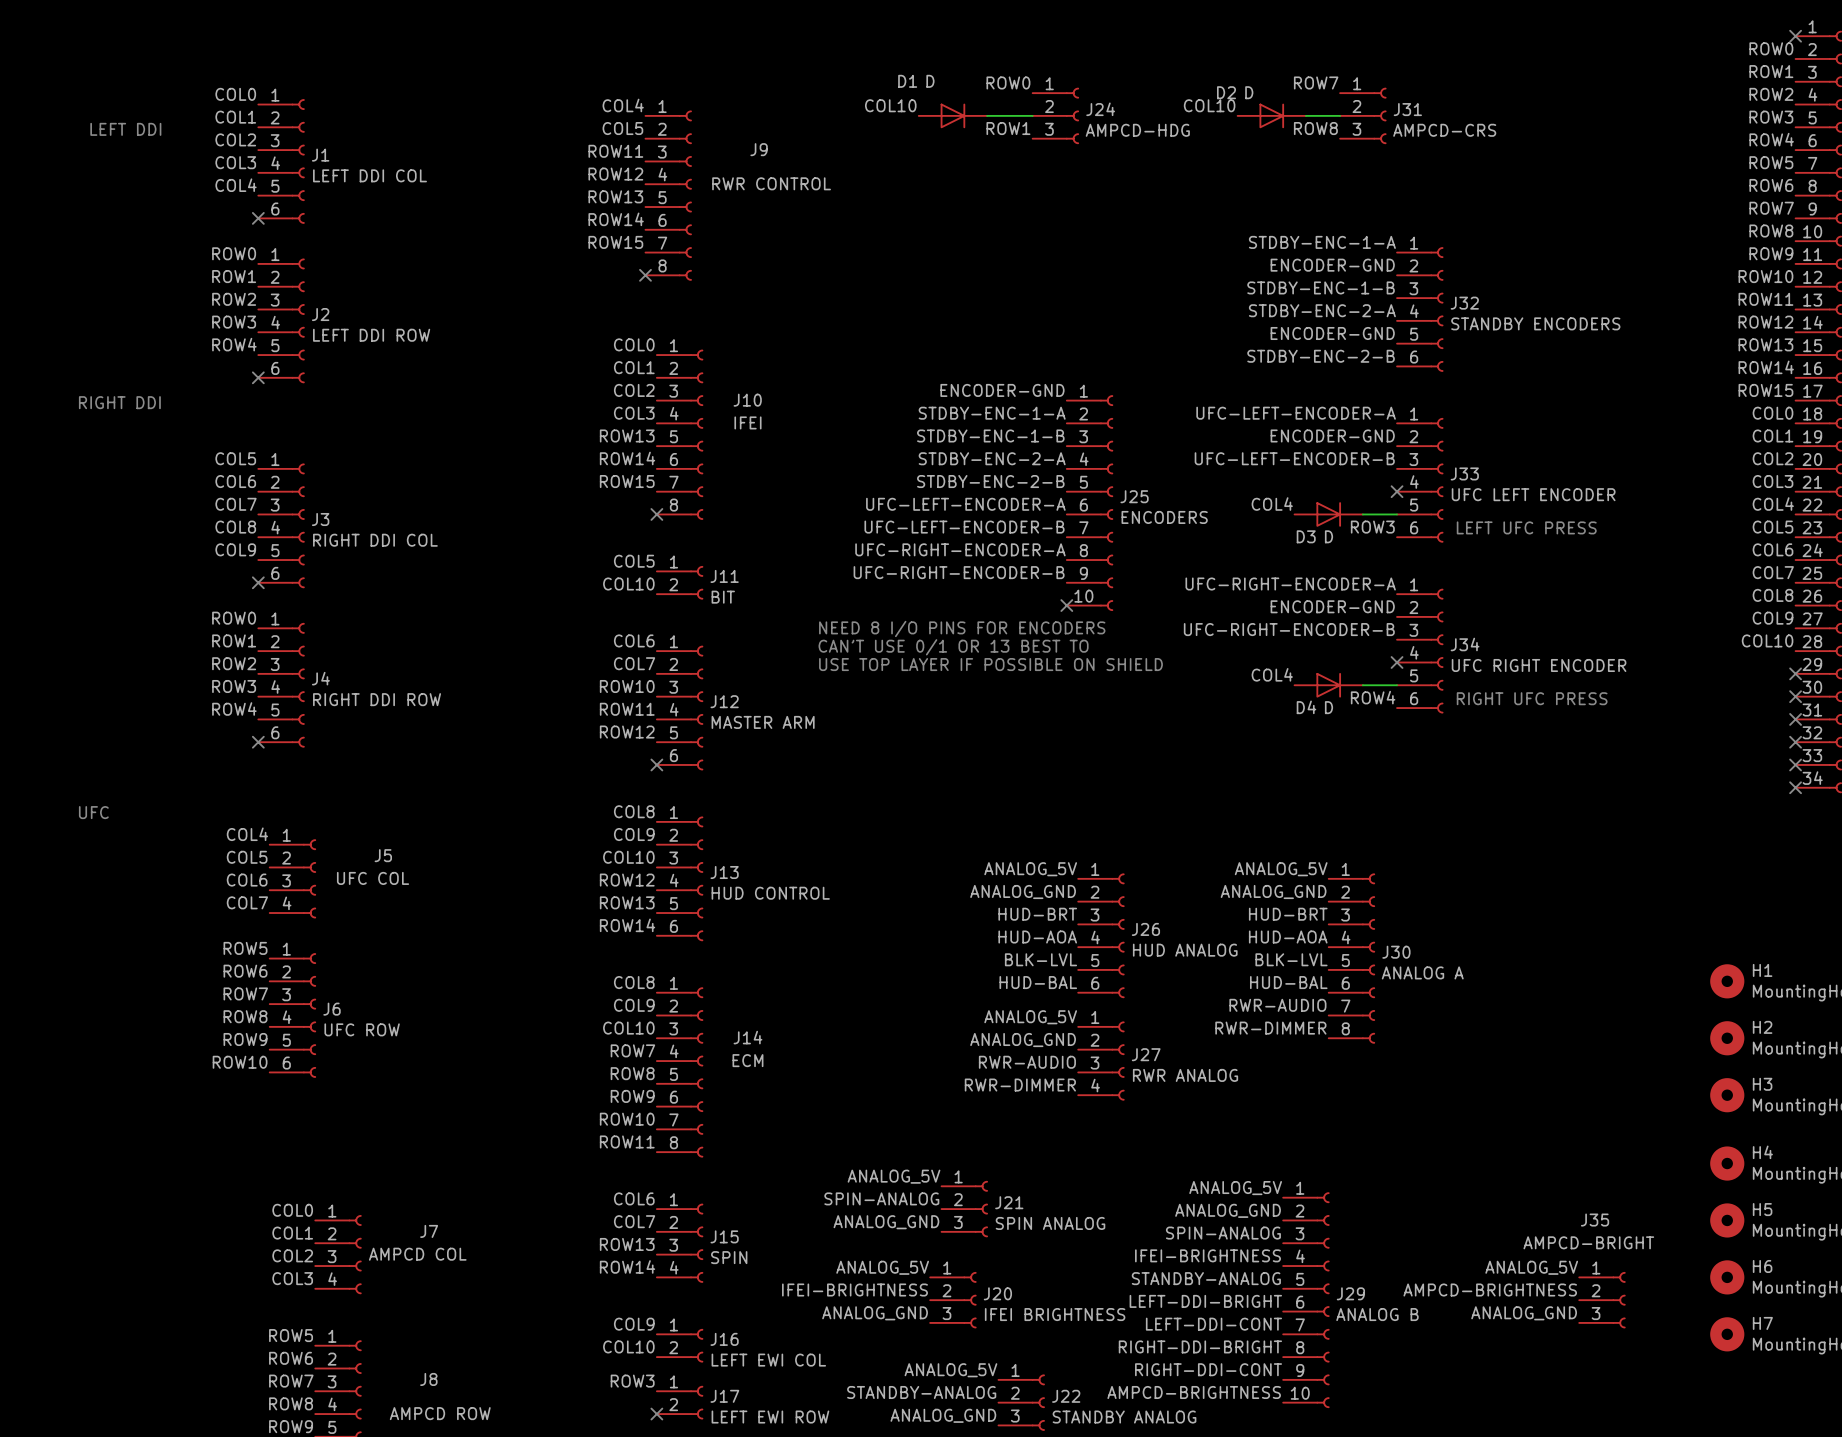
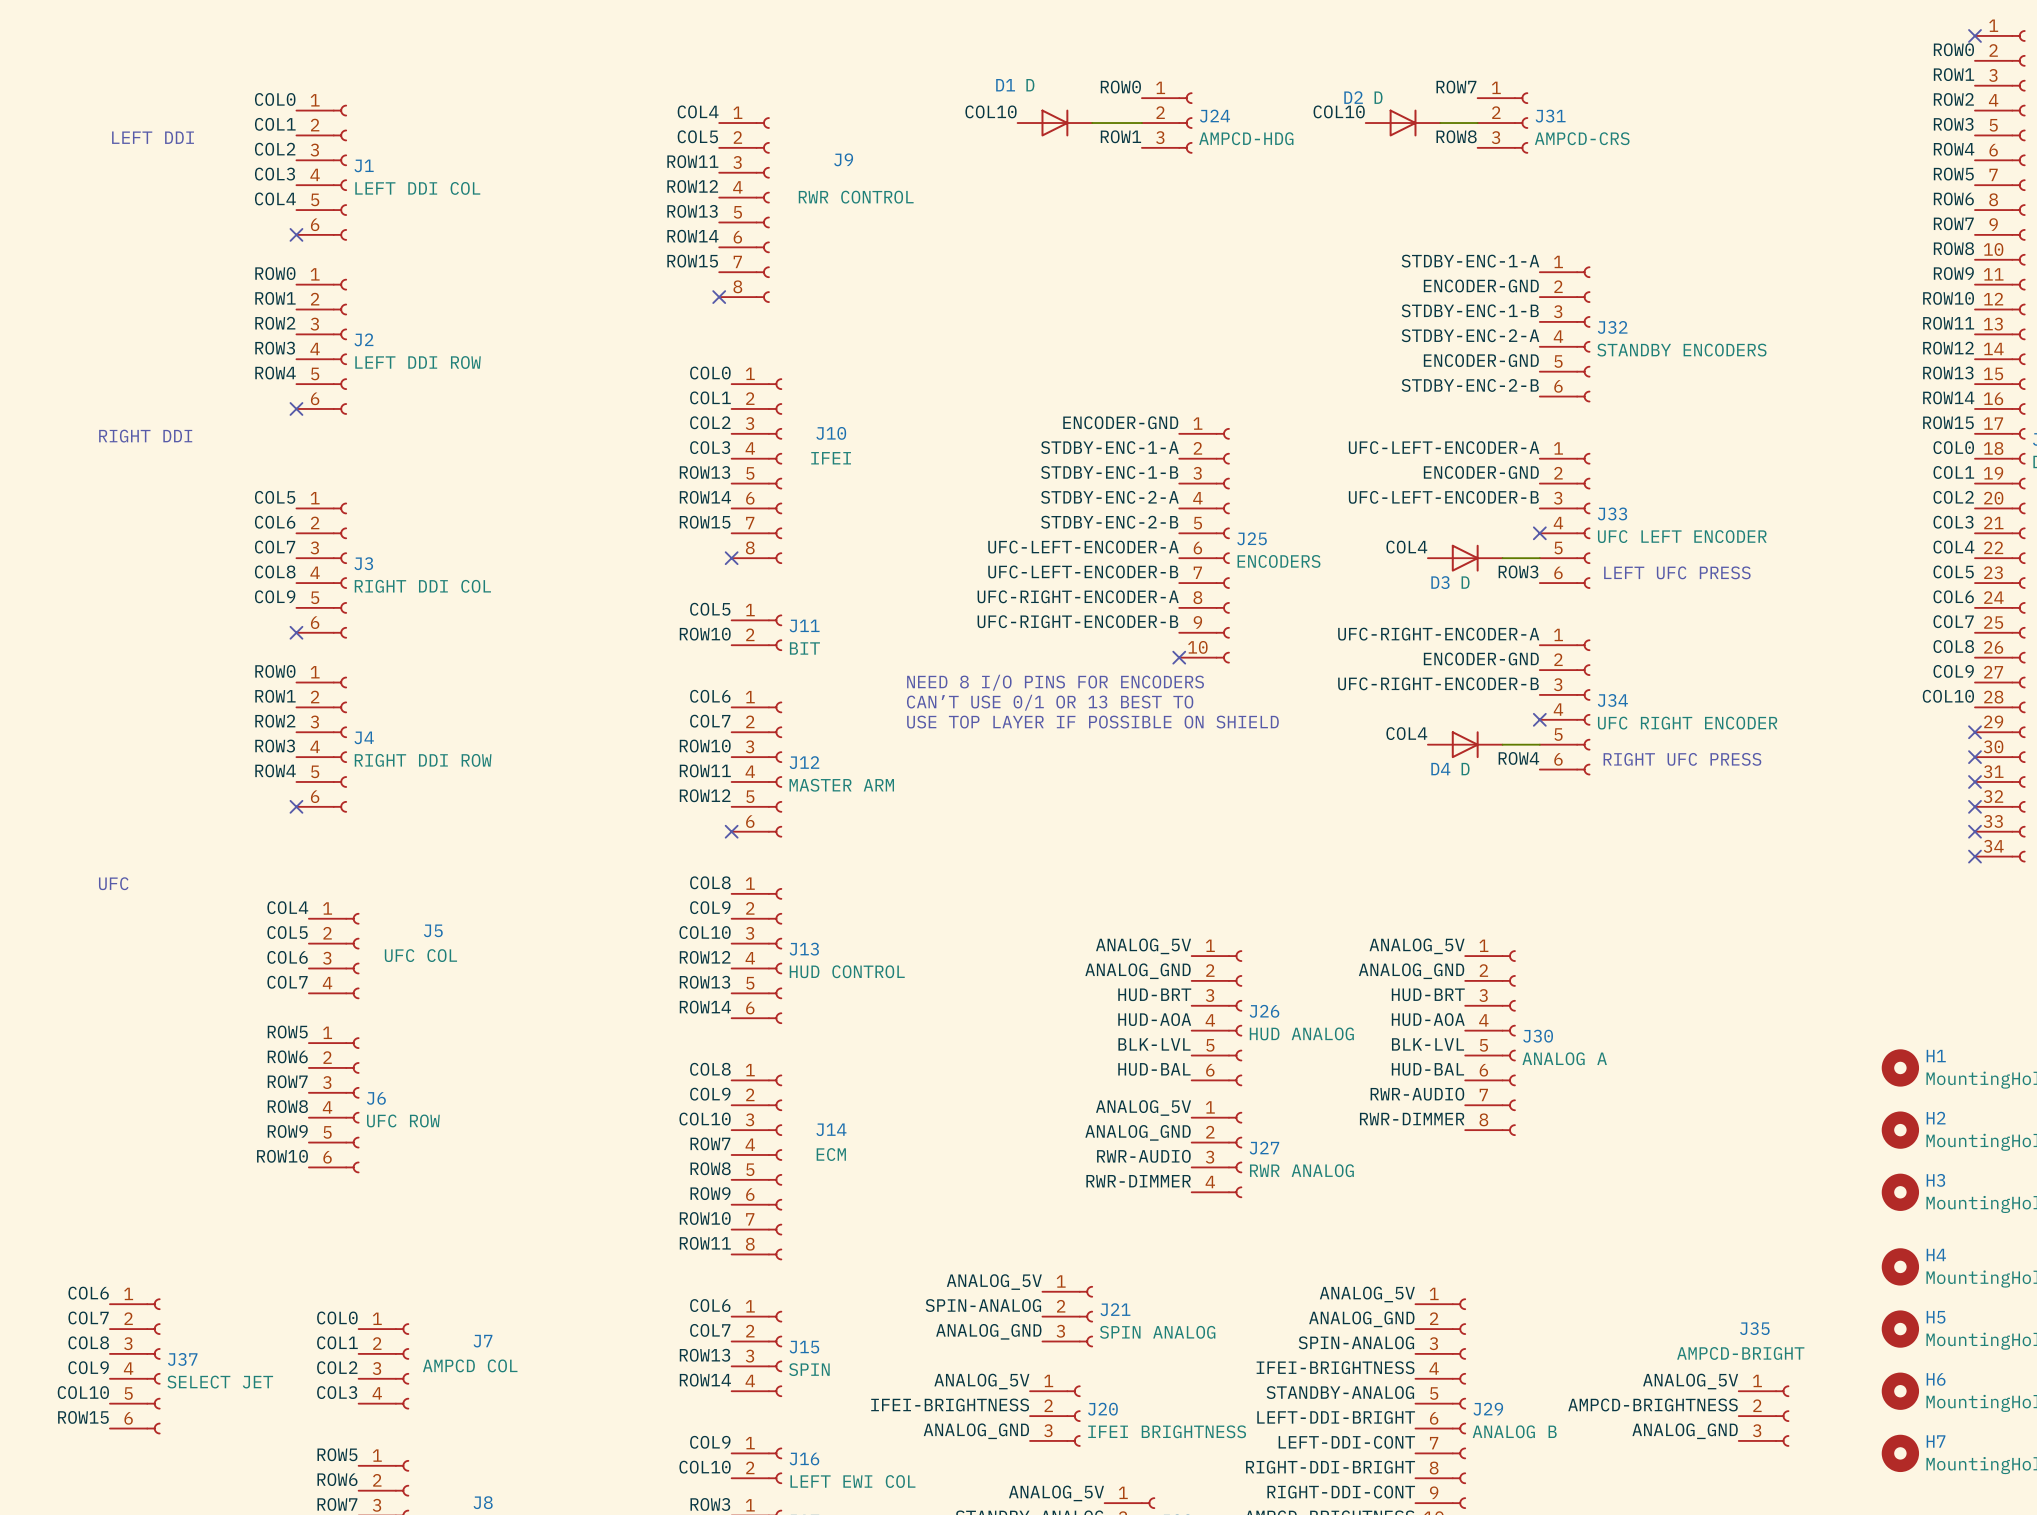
label: COL10 (628, 584) -> ROW10 (705, 634)
label: none -> COL6 (88, 1293)
label: none -> COL7 (88, 1317)
label: none -> COL8 (88, 1342)
J37: none -> SELECT JET (135, 1366)
label: none -> COL9 (88, 1367)
label: none -> COL10 (83, 1392)
label: none -> ROW15 (83, 1417)

